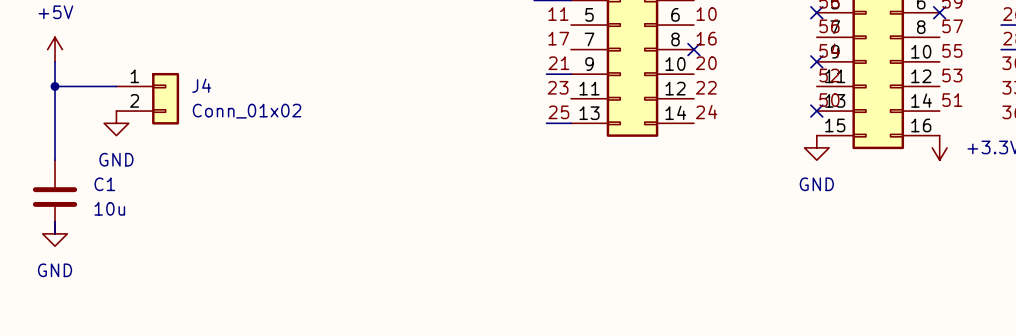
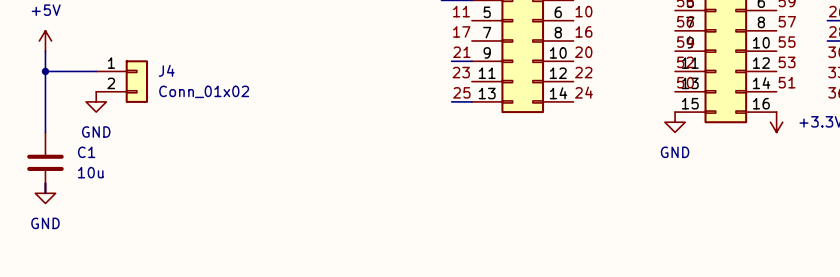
no-connect mark: (816, 12) -> none
no-connect mark: (939, 12) -> none
no-connect mark: (693, 49) -> none
no-connect mark: (816, 61) -> none
no-connect mark: (816, 111) -> none

